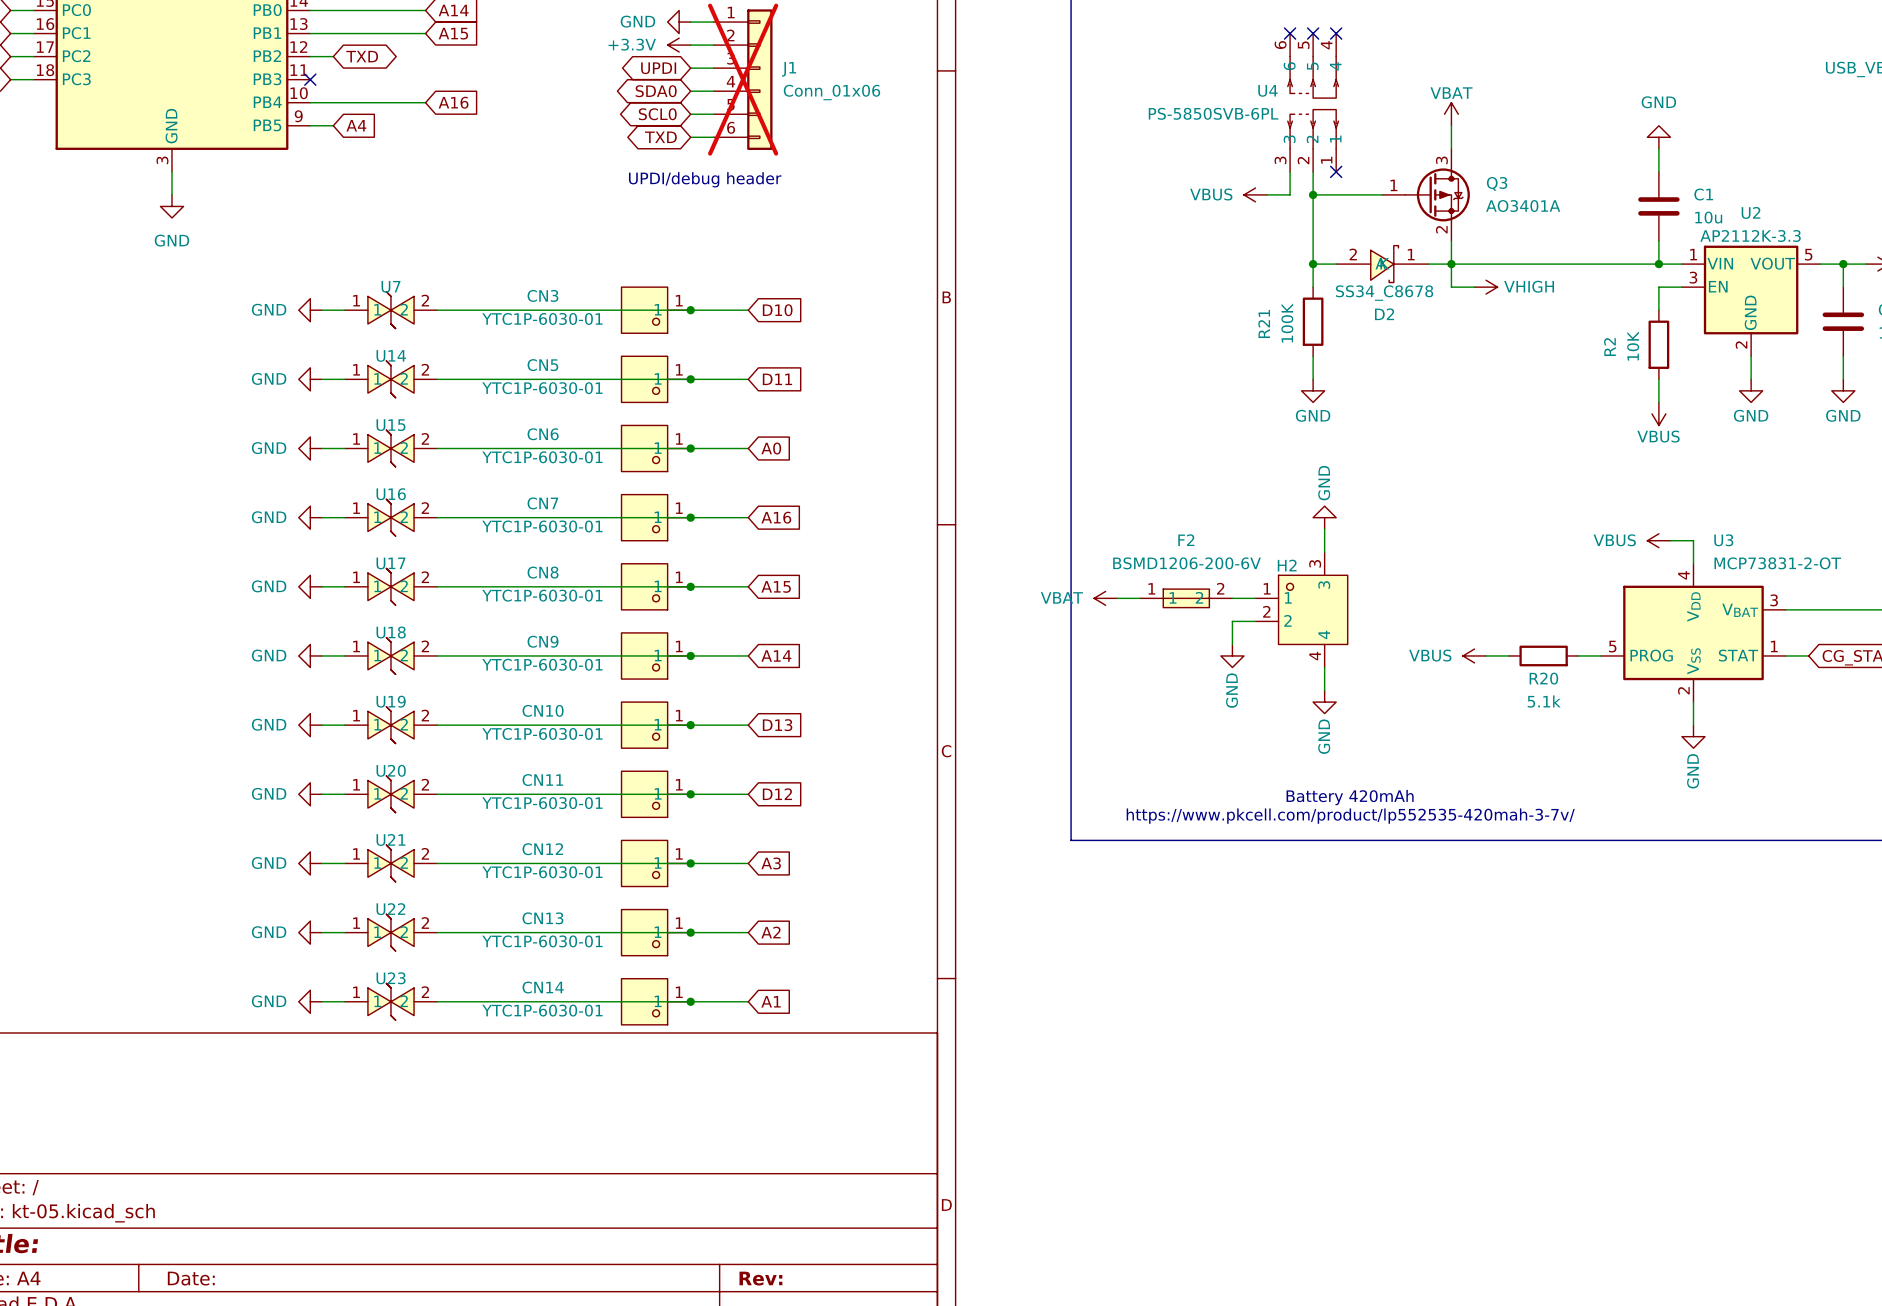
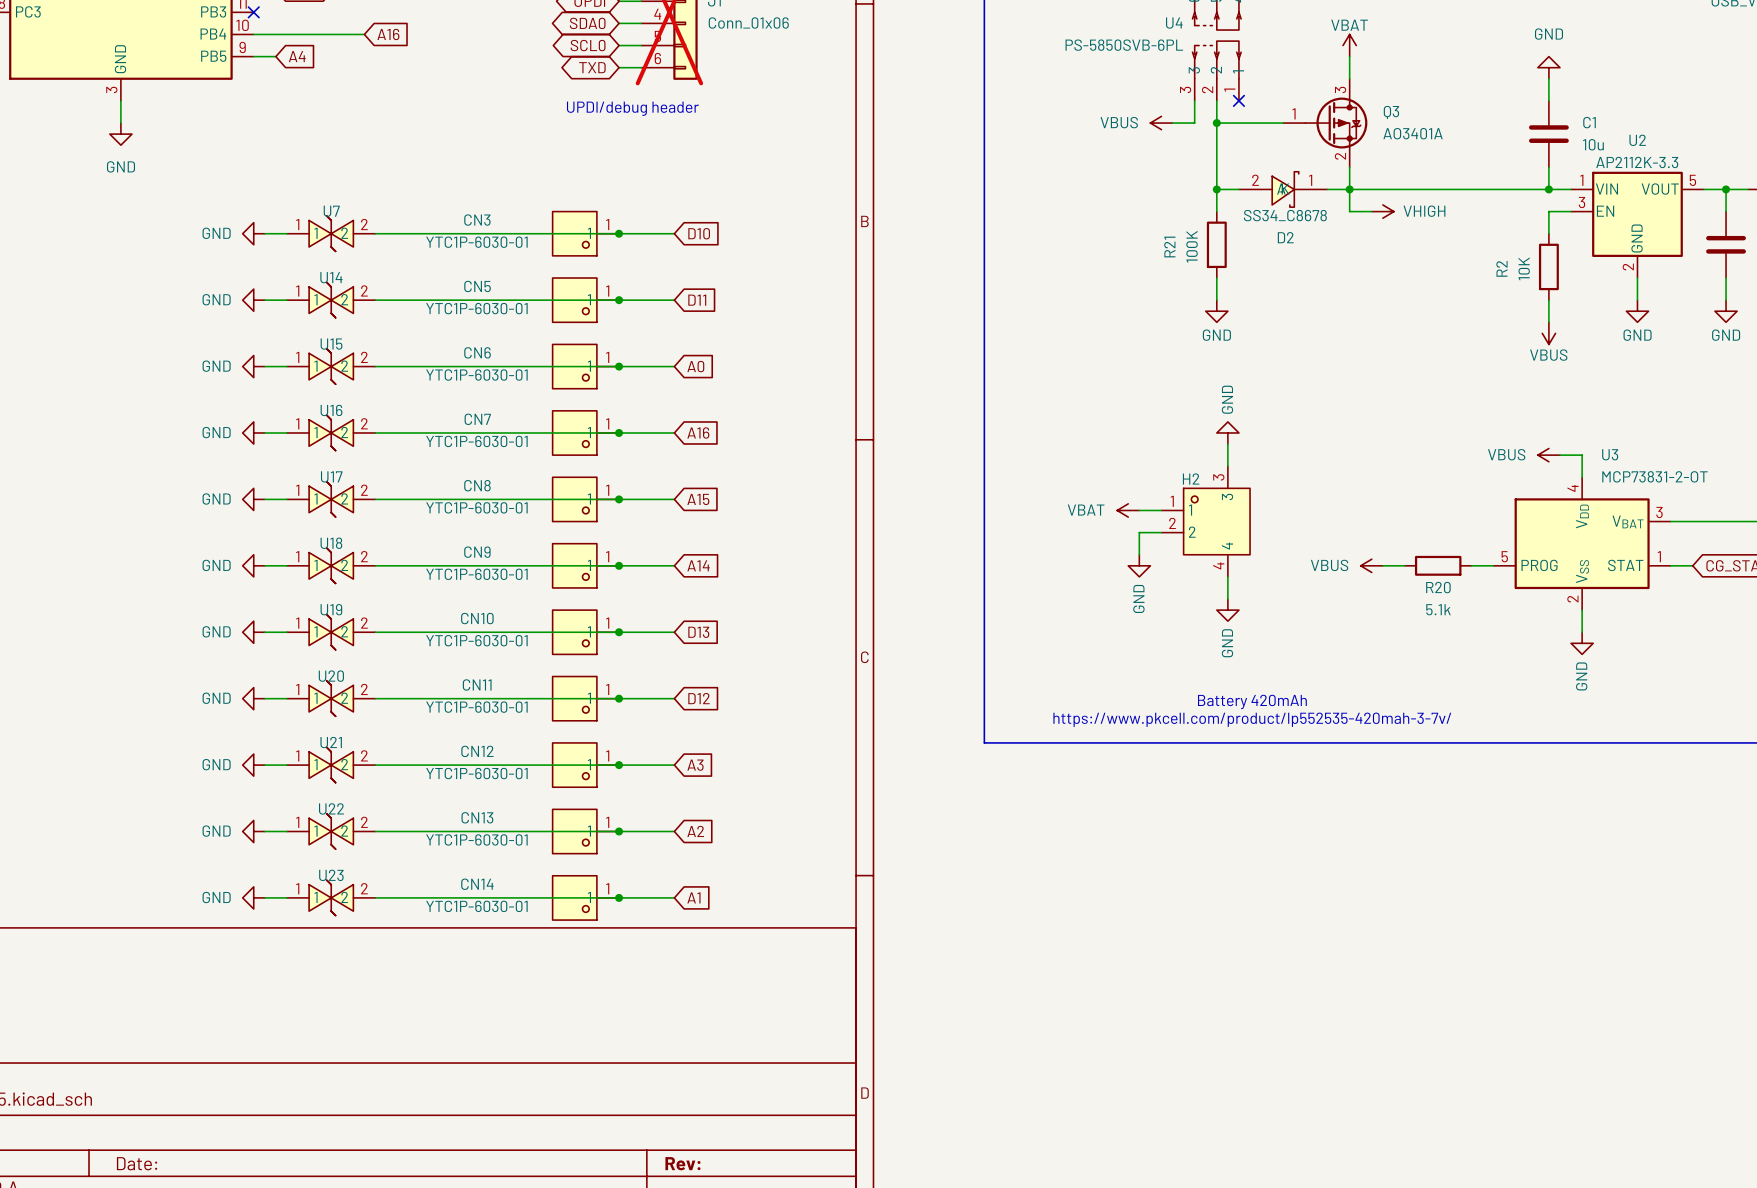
power symbol position: VBAT (1105, 598) -> VBAT (1128, 510)
wire: (1117, 598) (1140, 598) -> none
F2: BSMD1206-200-6V (1186, 598) -> none

